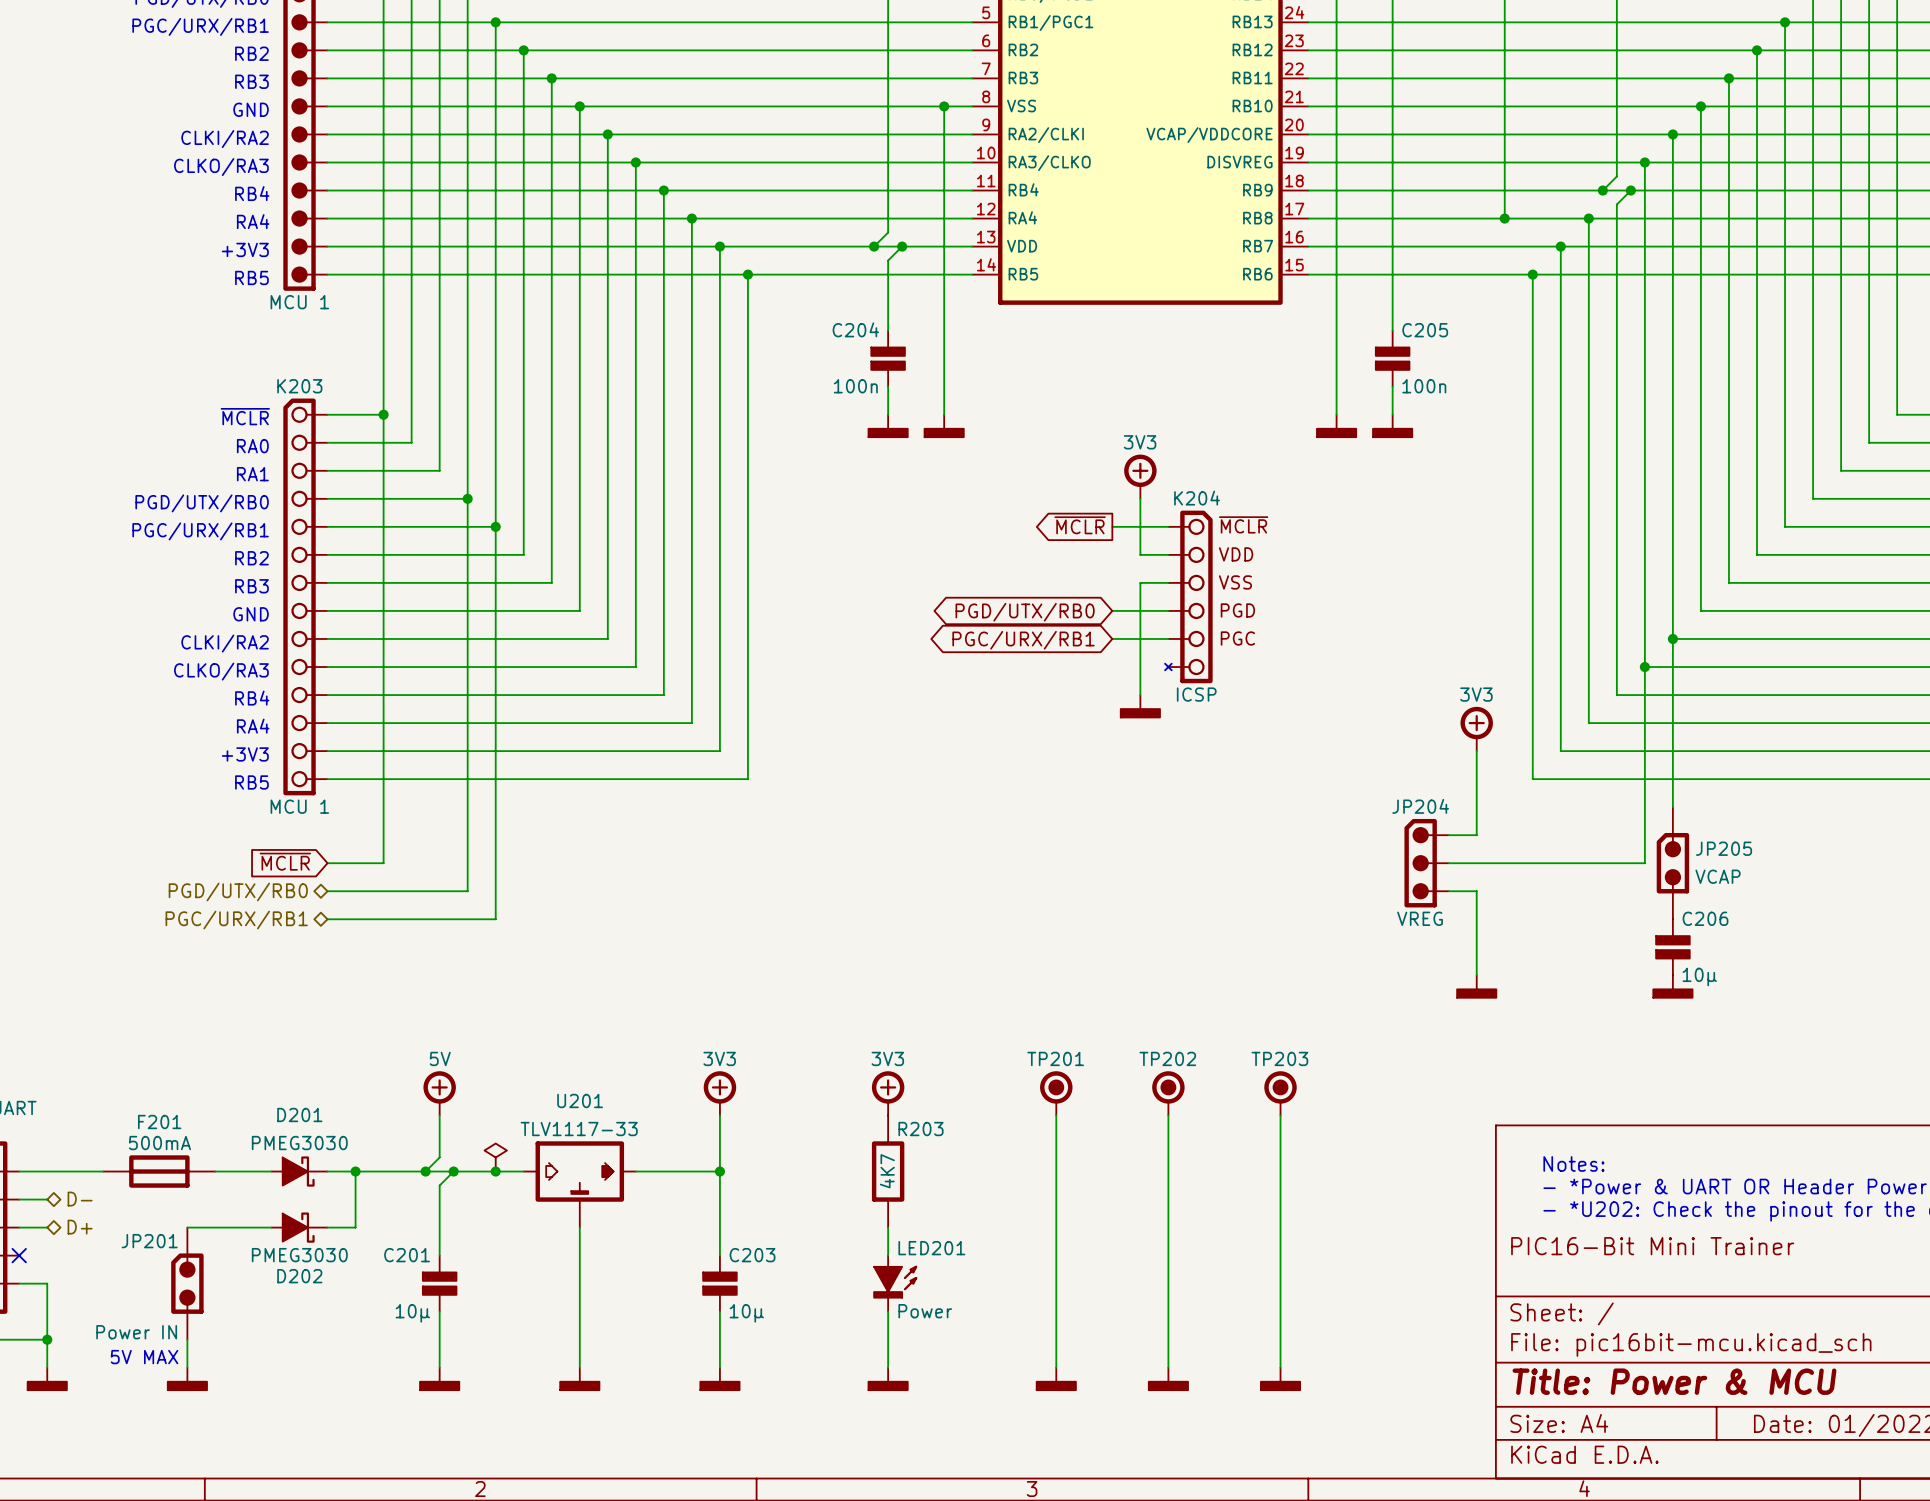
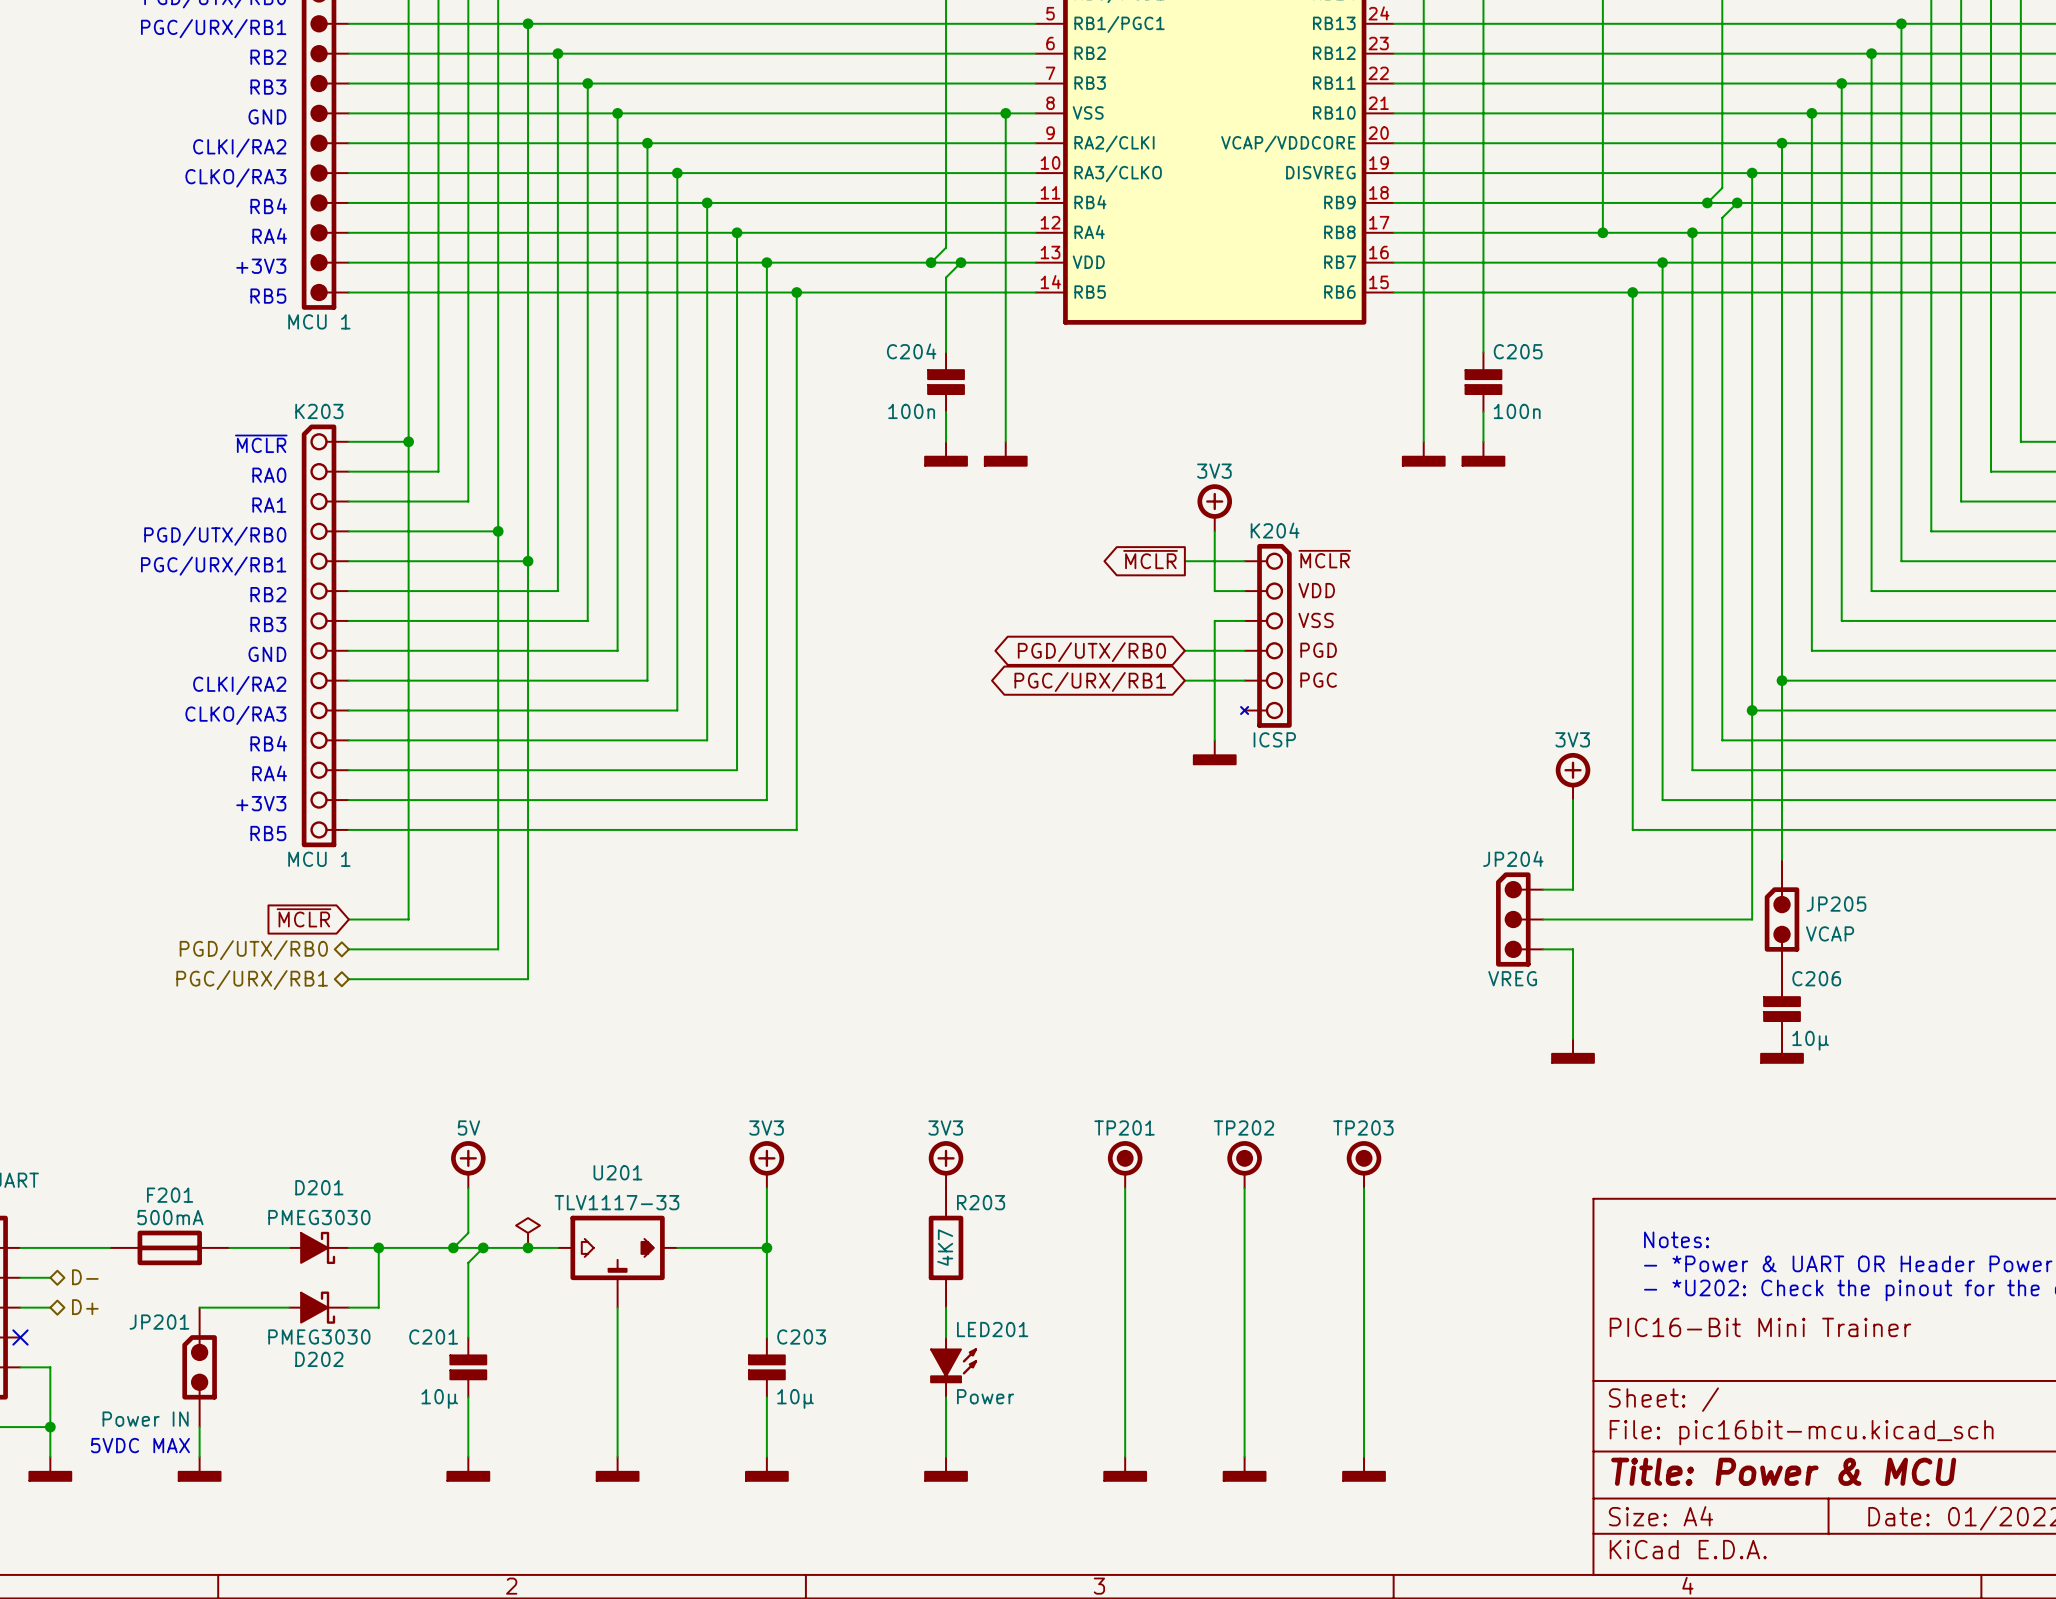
text: 5V MAX (144, 1357) -> 5VDC MAX (140, 1445)

